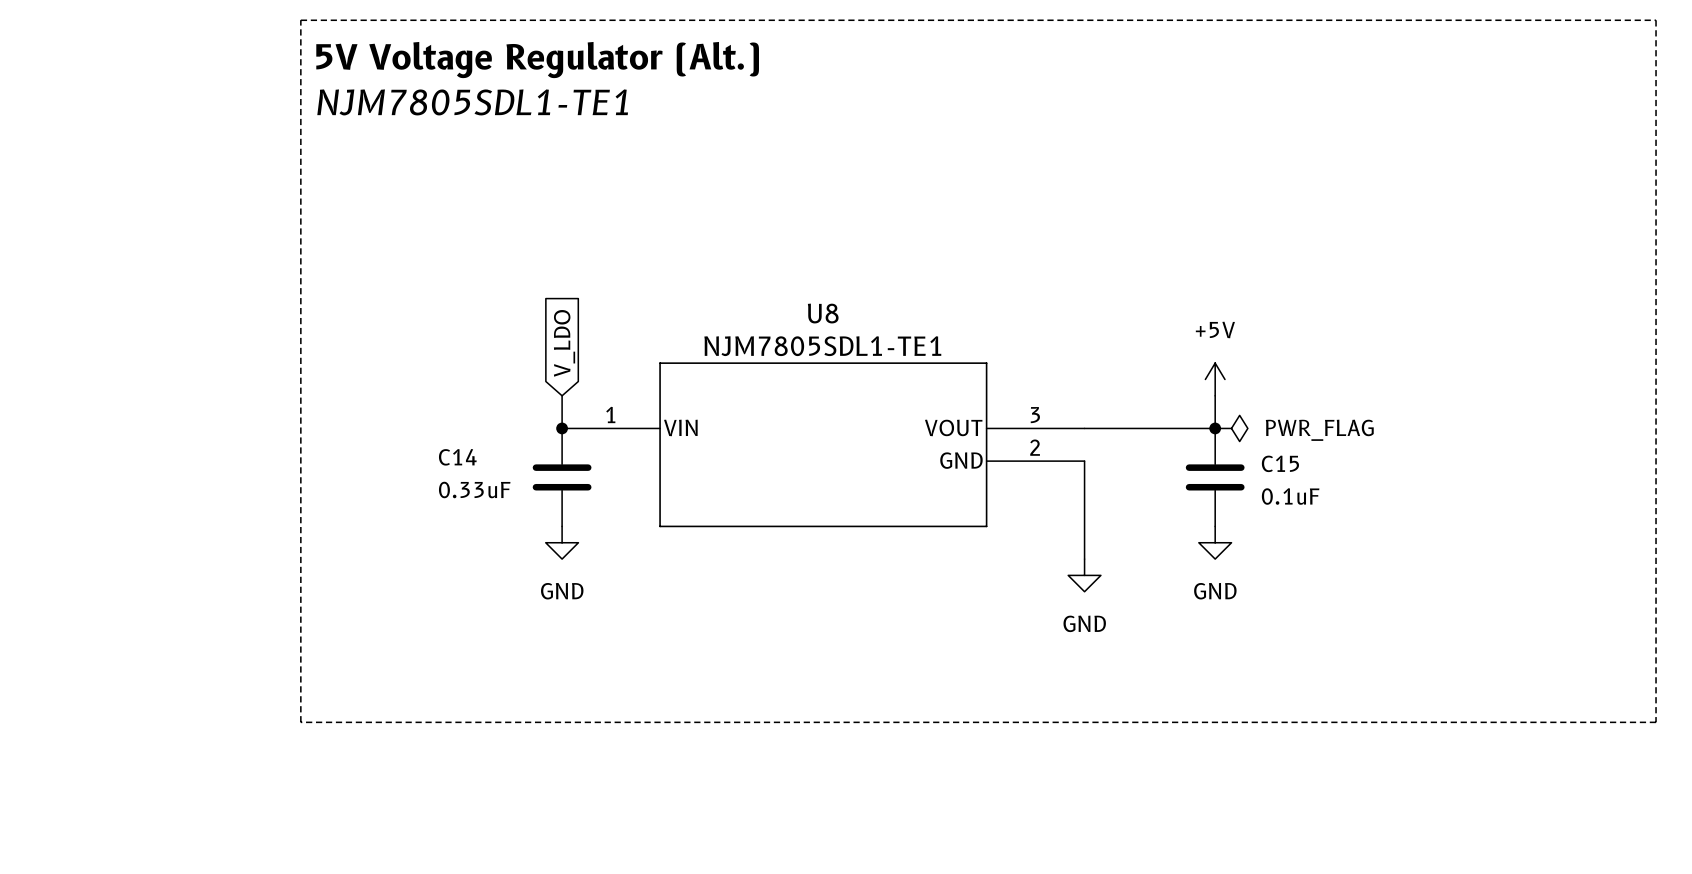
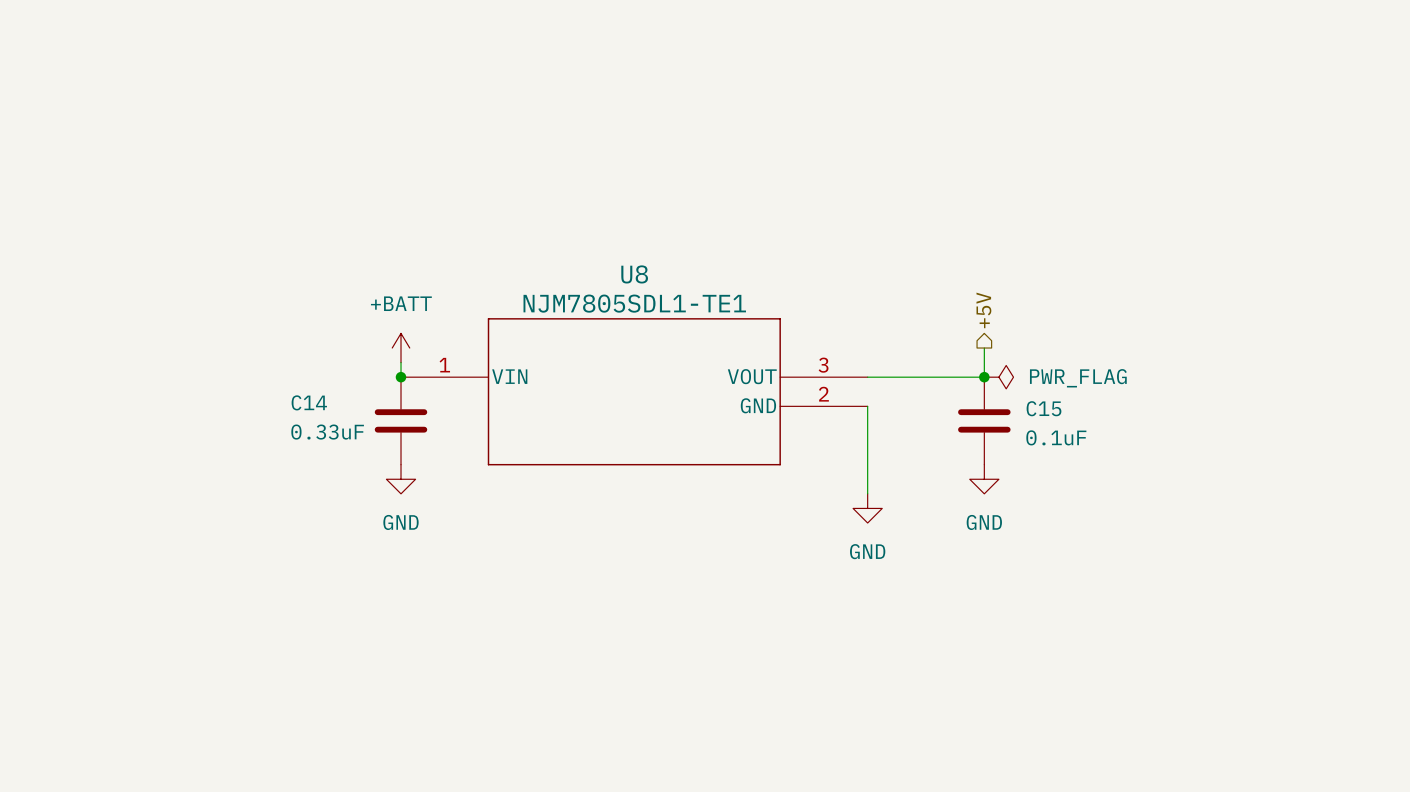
line: (300, 20) (1656, 20) (1656, 722) (300, 722) (300, 20) -> none
text: 5V Voltage Regulator (Alt.) (537, 60) -> none
text: NJM7805SDL1-TE1 (472, 102) -> none
global label: V_LDO (564, 343) -> none
hierarchical label: none -> +5V (983, 310)
power symbol: +5V (1215, 379) -> none
power symbol: none -> +BATT (401, 348)

